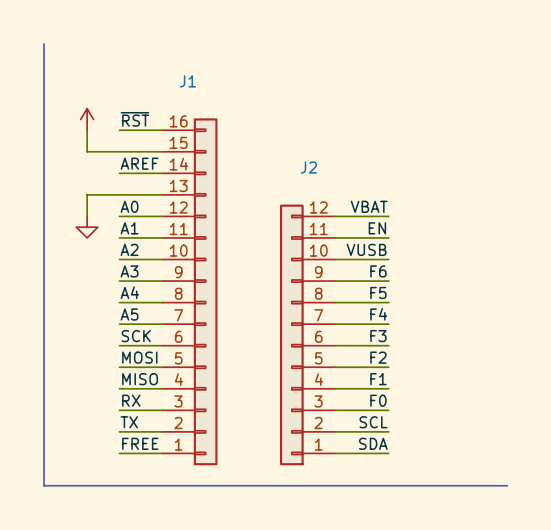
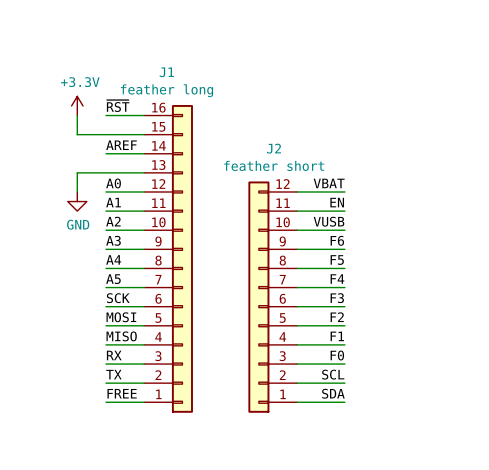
line: (44, 44) (44, 485) (507, 485) -> none
power symbol text: none -> +3.3V (80, 82)
J1 value: none -> feather long (166, 90)
J2 value: none -> feather short (274, 165)
power symbol text: none -> GND (78, 224)

